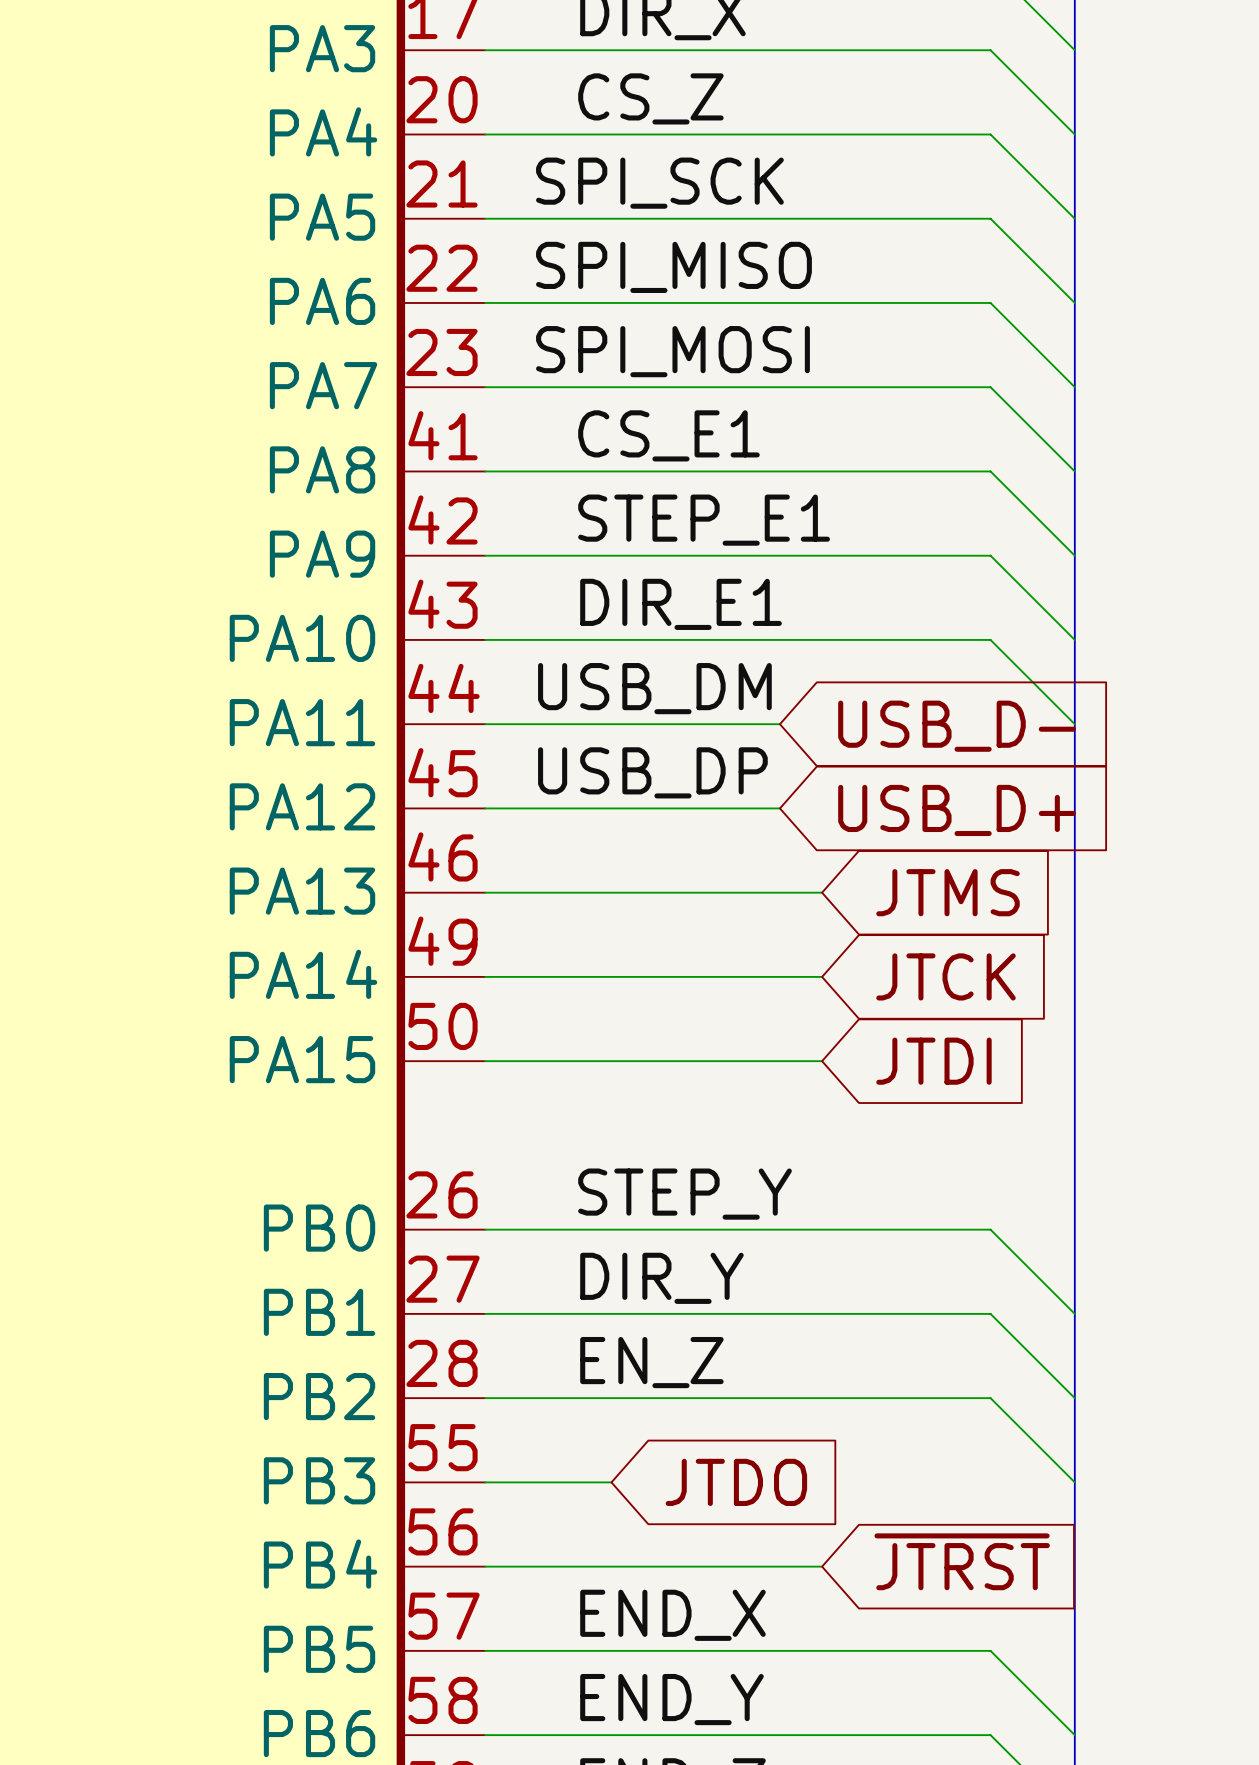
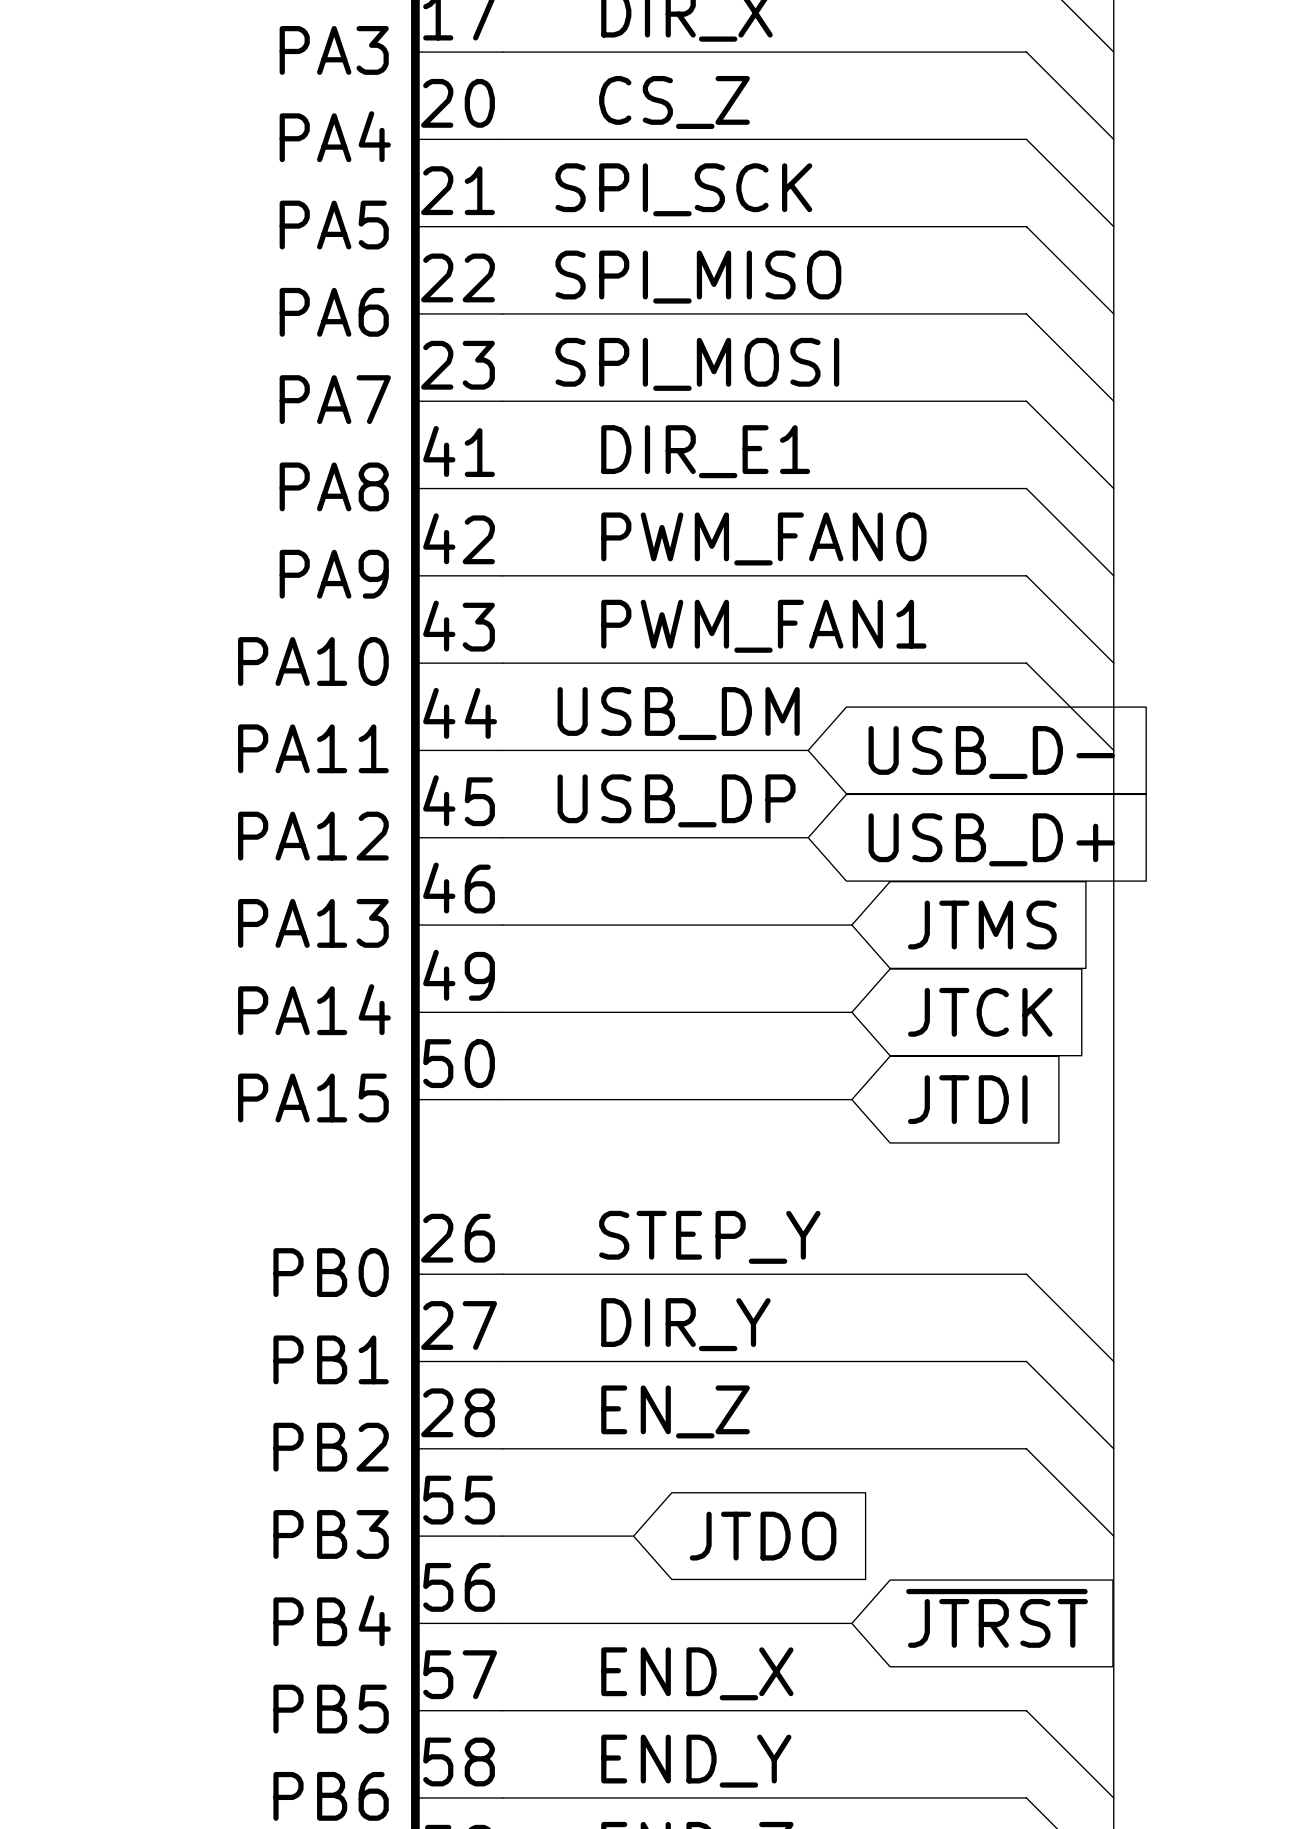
label: CS_E1 (668, 435) -> DIR_E1 (705, 451)
label: STEP_E1 (704, 520) -> PWM_FAN0 (763, 538)
label: DIR_E1 (680, 604) -> PWM_FAN1 (763, 626)

